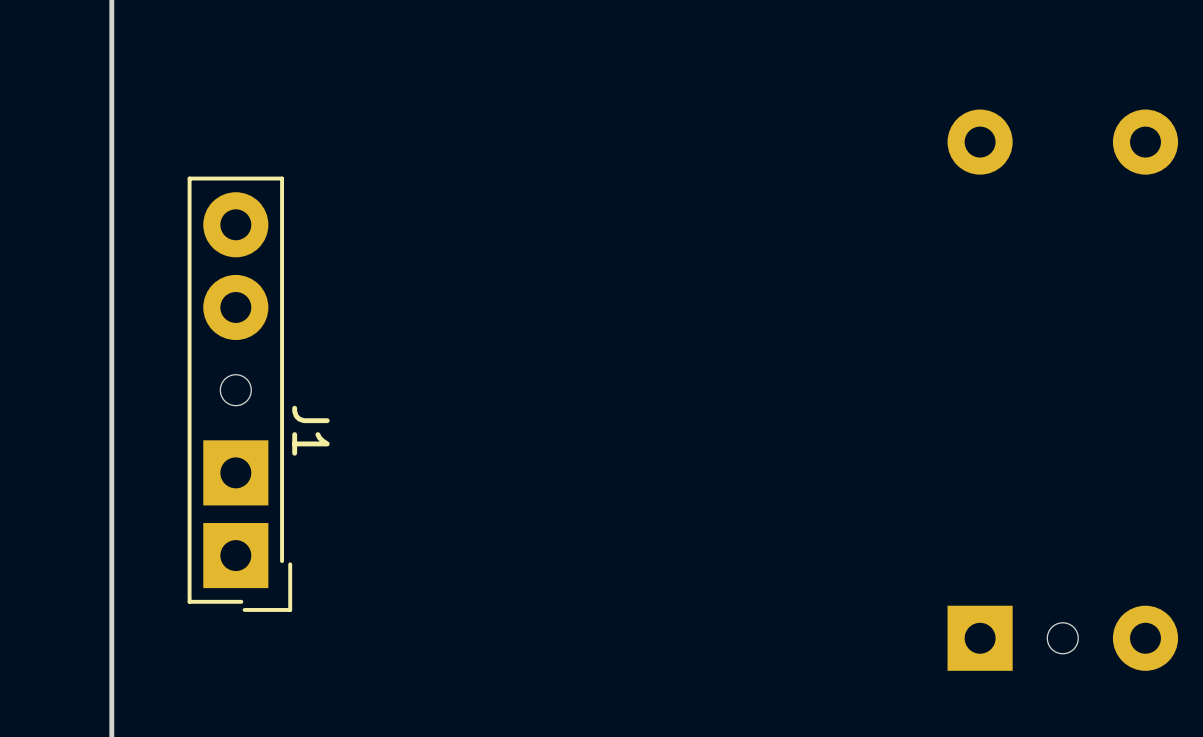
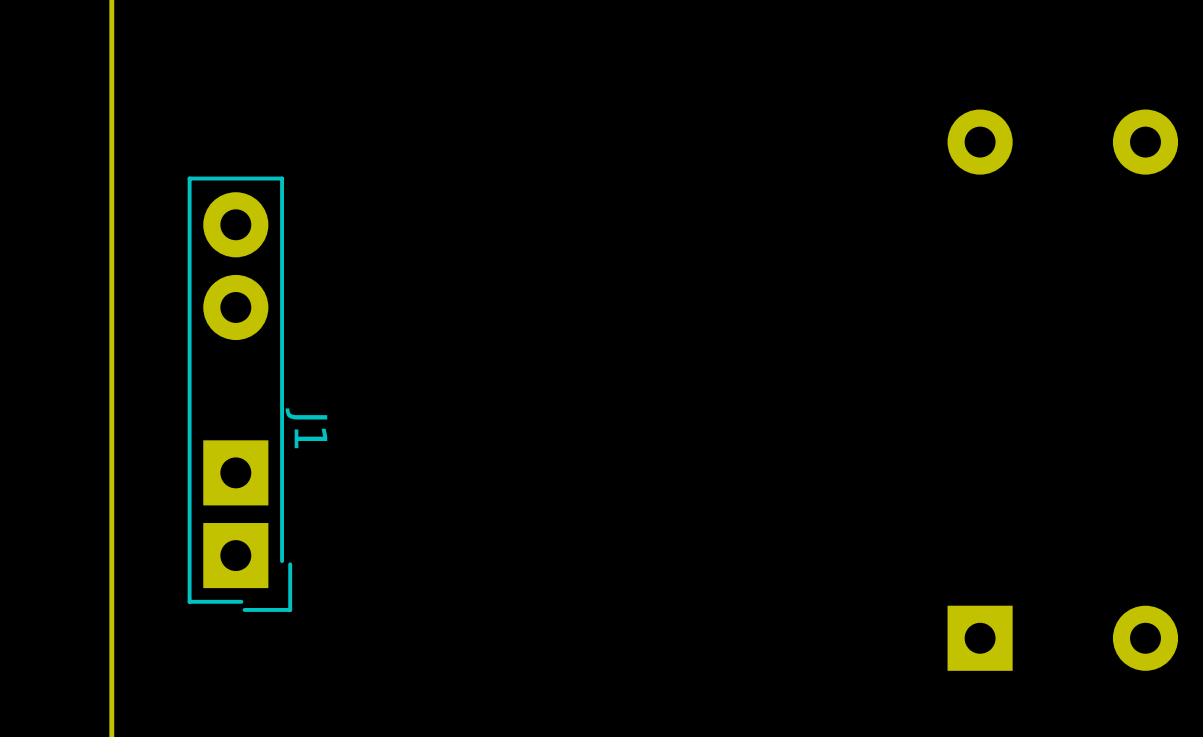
J1 footprint: [187, 109, 1179, 671] -> [187, 109, 1179, 671]

